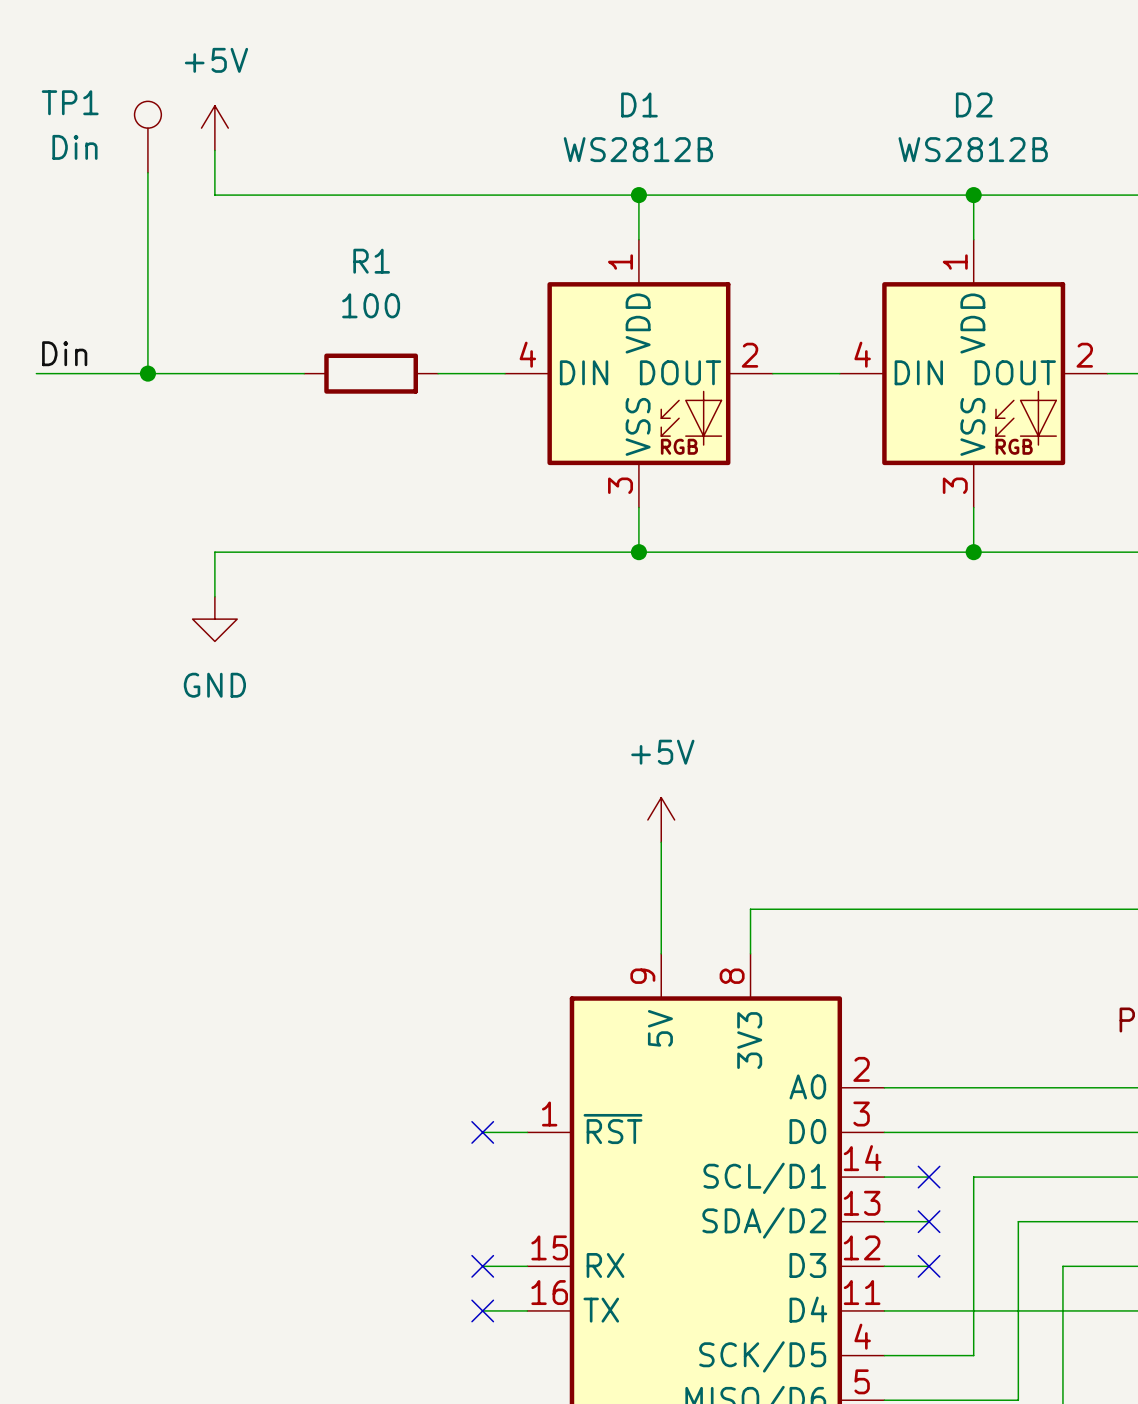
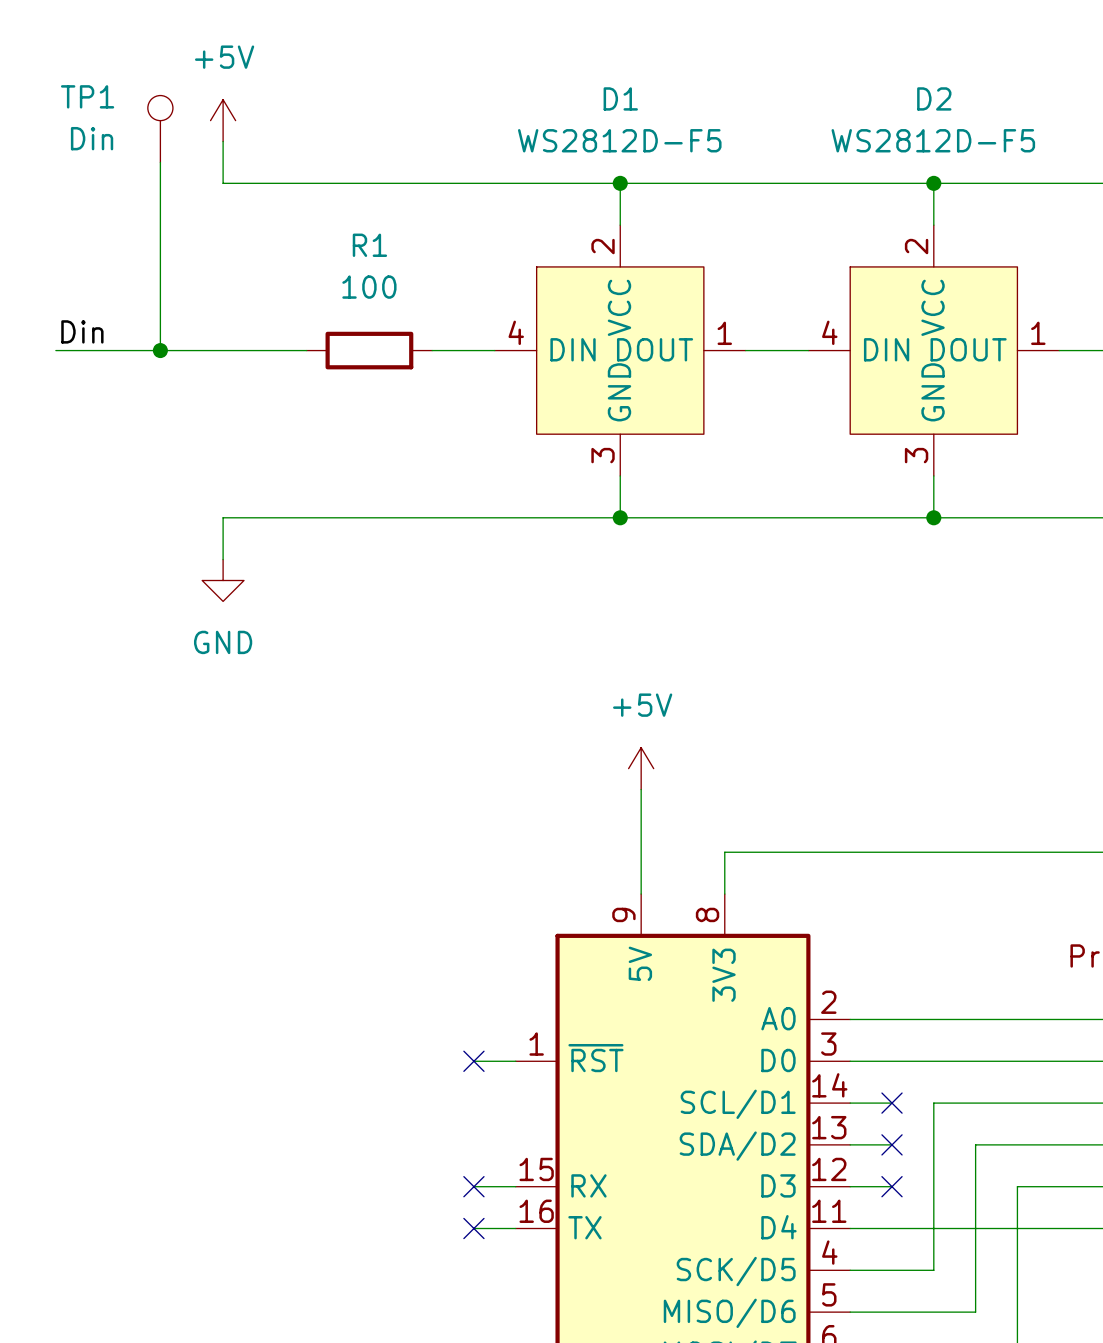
D1 value: WS2812B (638, 149) -> WS2812D-F5 (619, 140)
D2 value: WS2812B (973, 149) -> WS2812D-F5 (933, 140)
D1 symbol: [505, 239, 773, 508] -> [494, 225, 746, 476]
D2 symbol: [839, 239, 1108, 508] -> [808, 225, 1060, 476]

